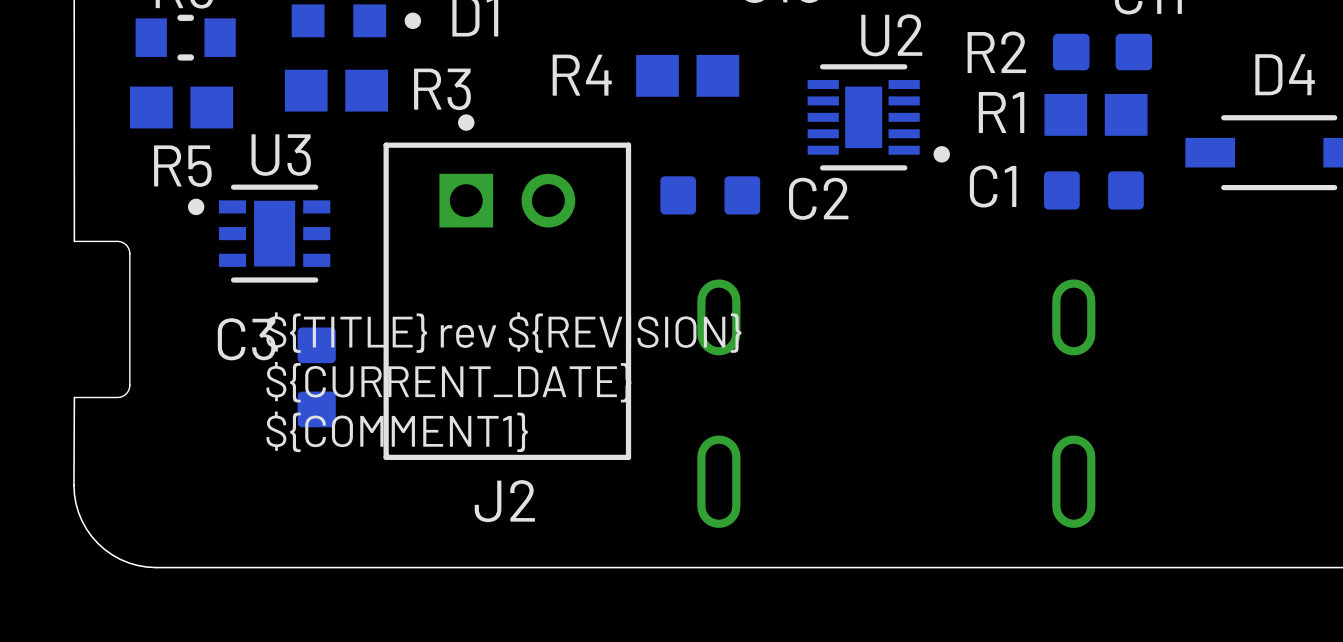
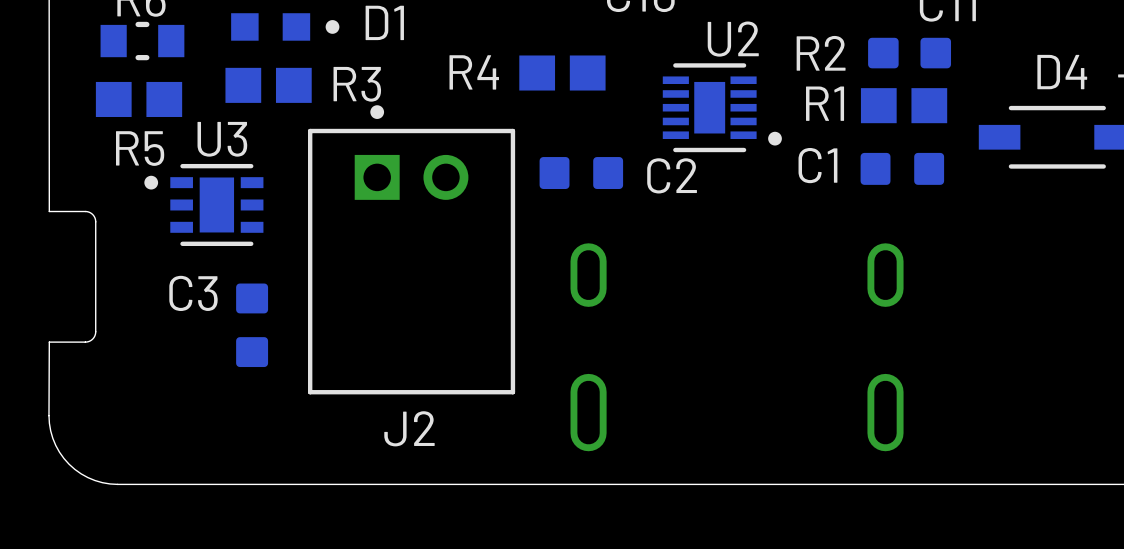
text: ${TITLE} rev ${REVISION} (503, 332) -> none
text: ${CURRENT_DATE} (448, 382) -> none
text: ${COMMENT1} (397, 431) -> none

